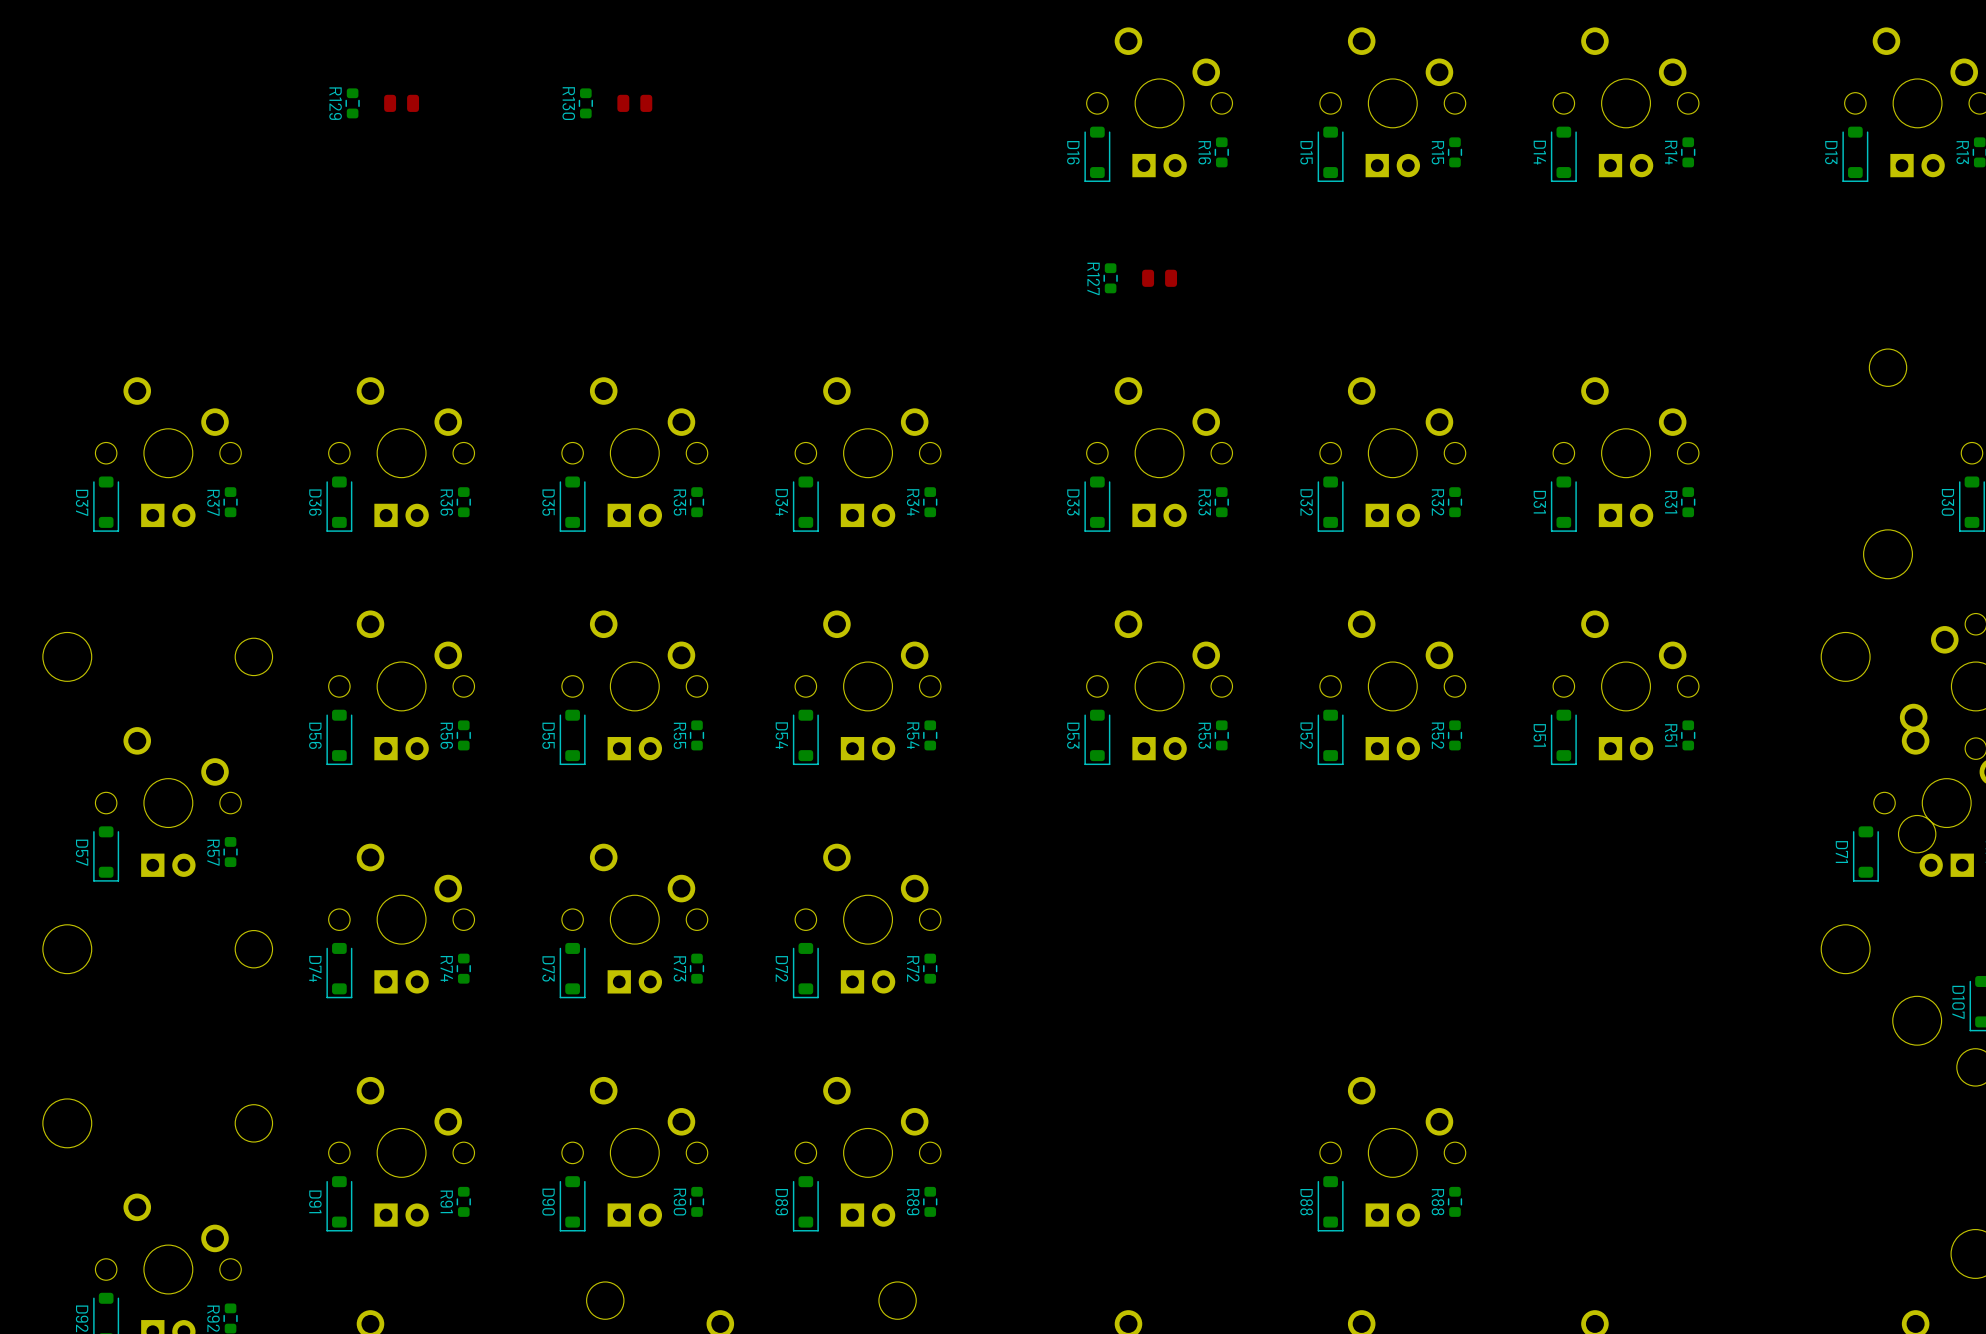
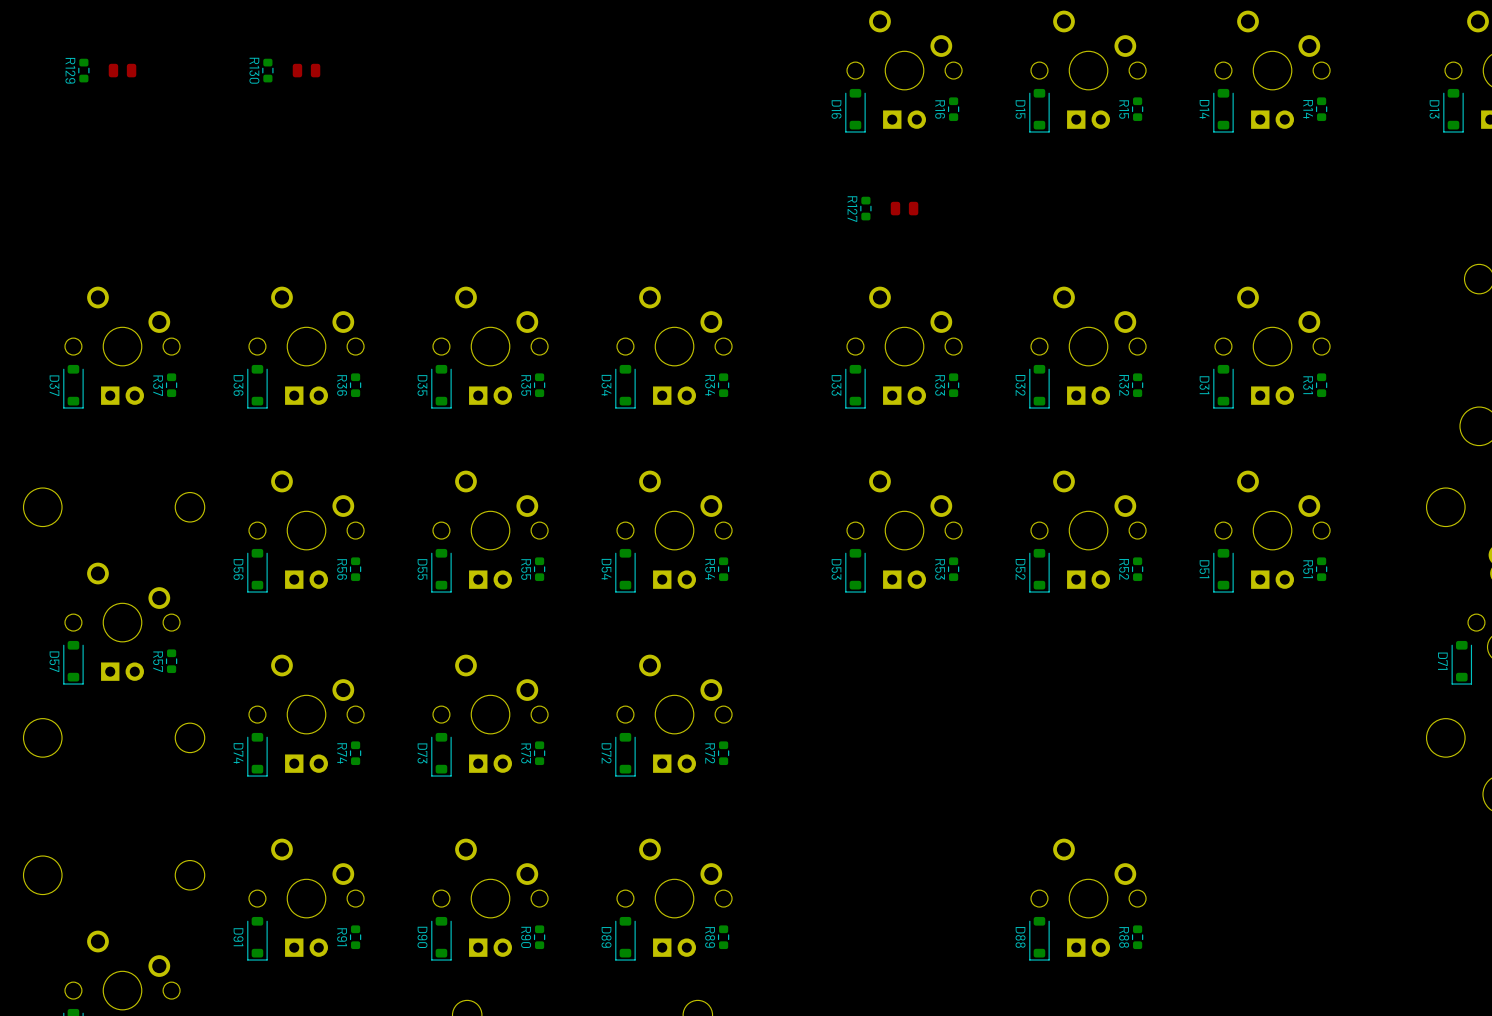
R129: none -> (83, 70)
part: none -> (122, 70)
R129 name: R129 (335, 103) -> R130 (254, 70)
R130: (585, 103) -> none
part: (634, 103) -> none

